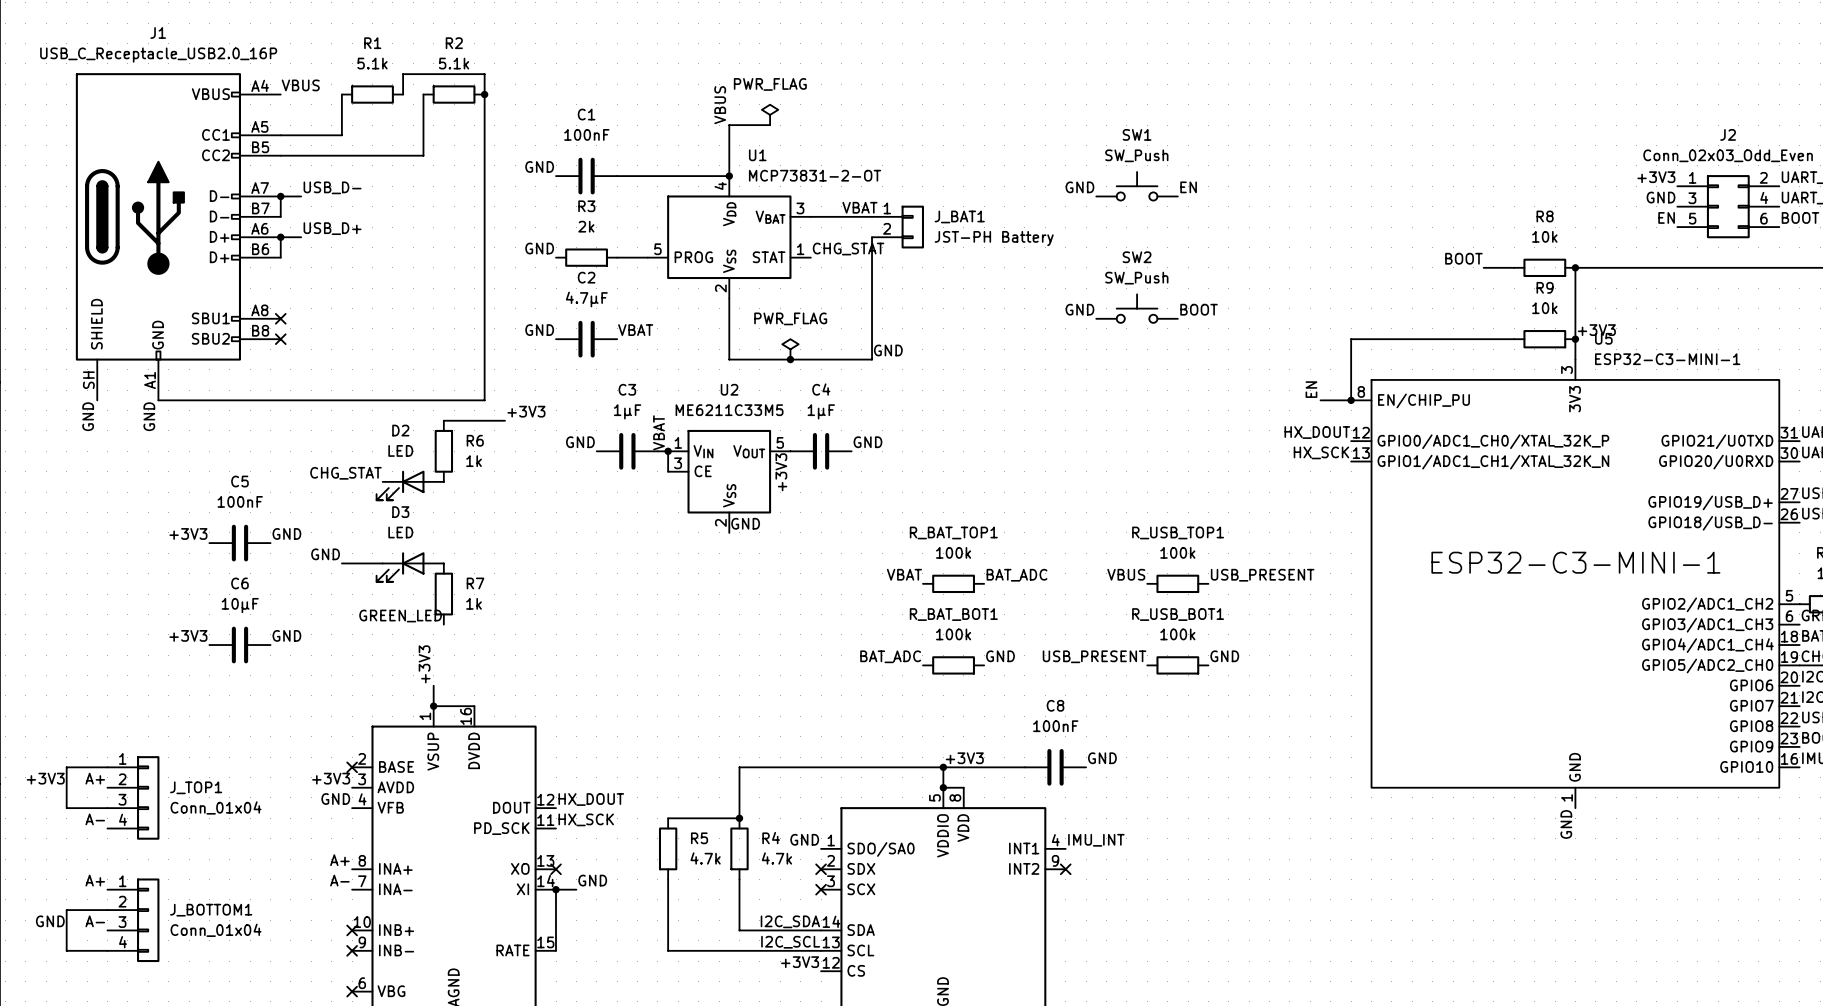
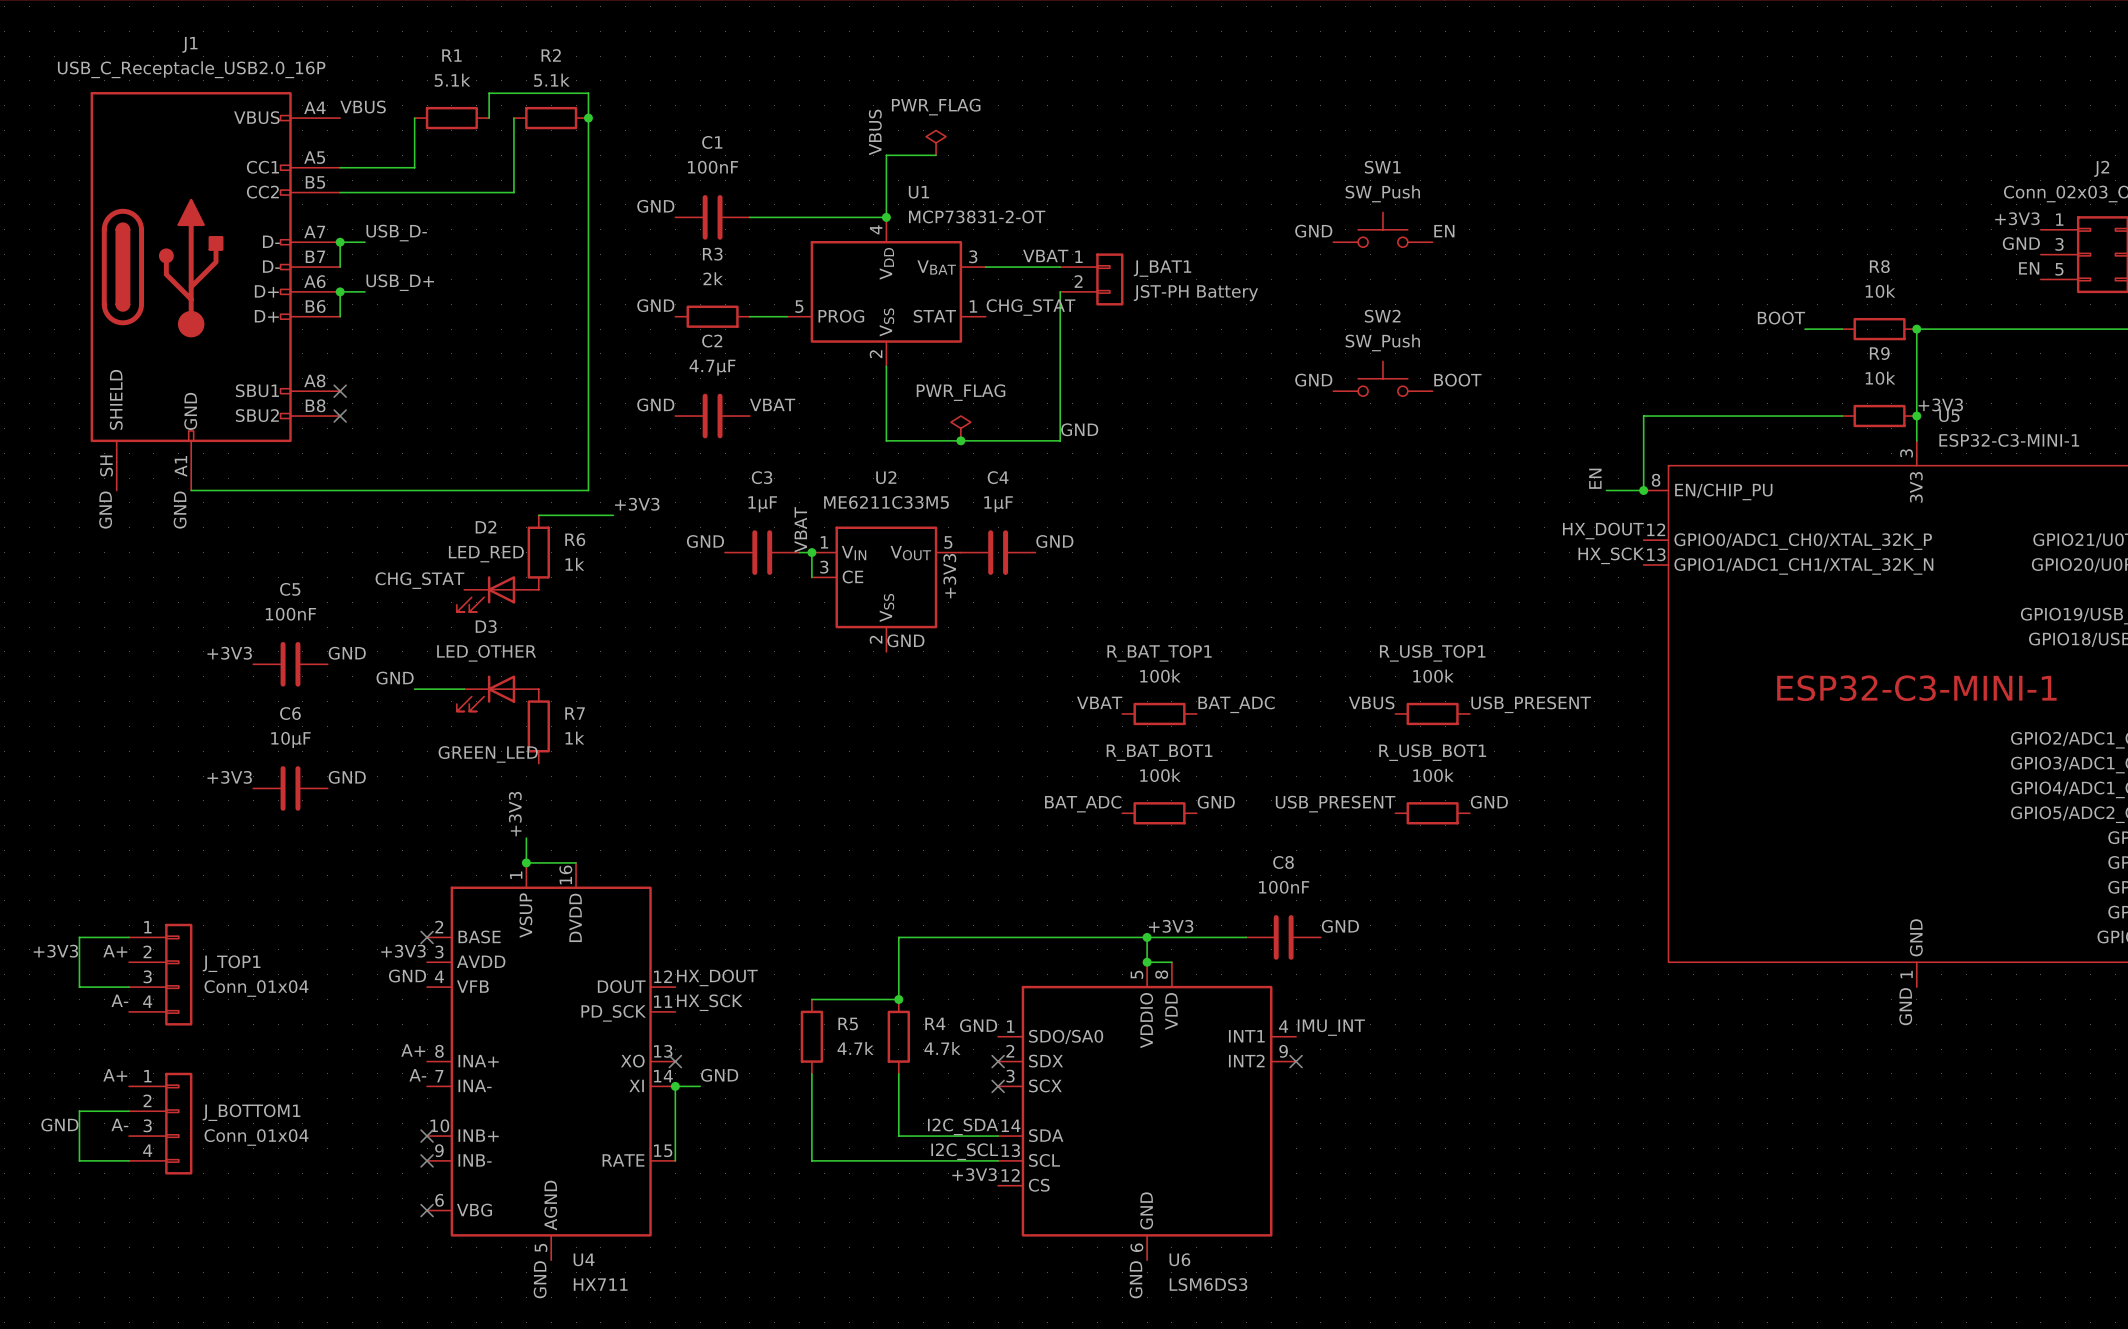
D2 value: LED (400, 450) -> LED_RED (486, 554)
D3 value: LED (400, 532) -> LED_OTHER (486, 653)

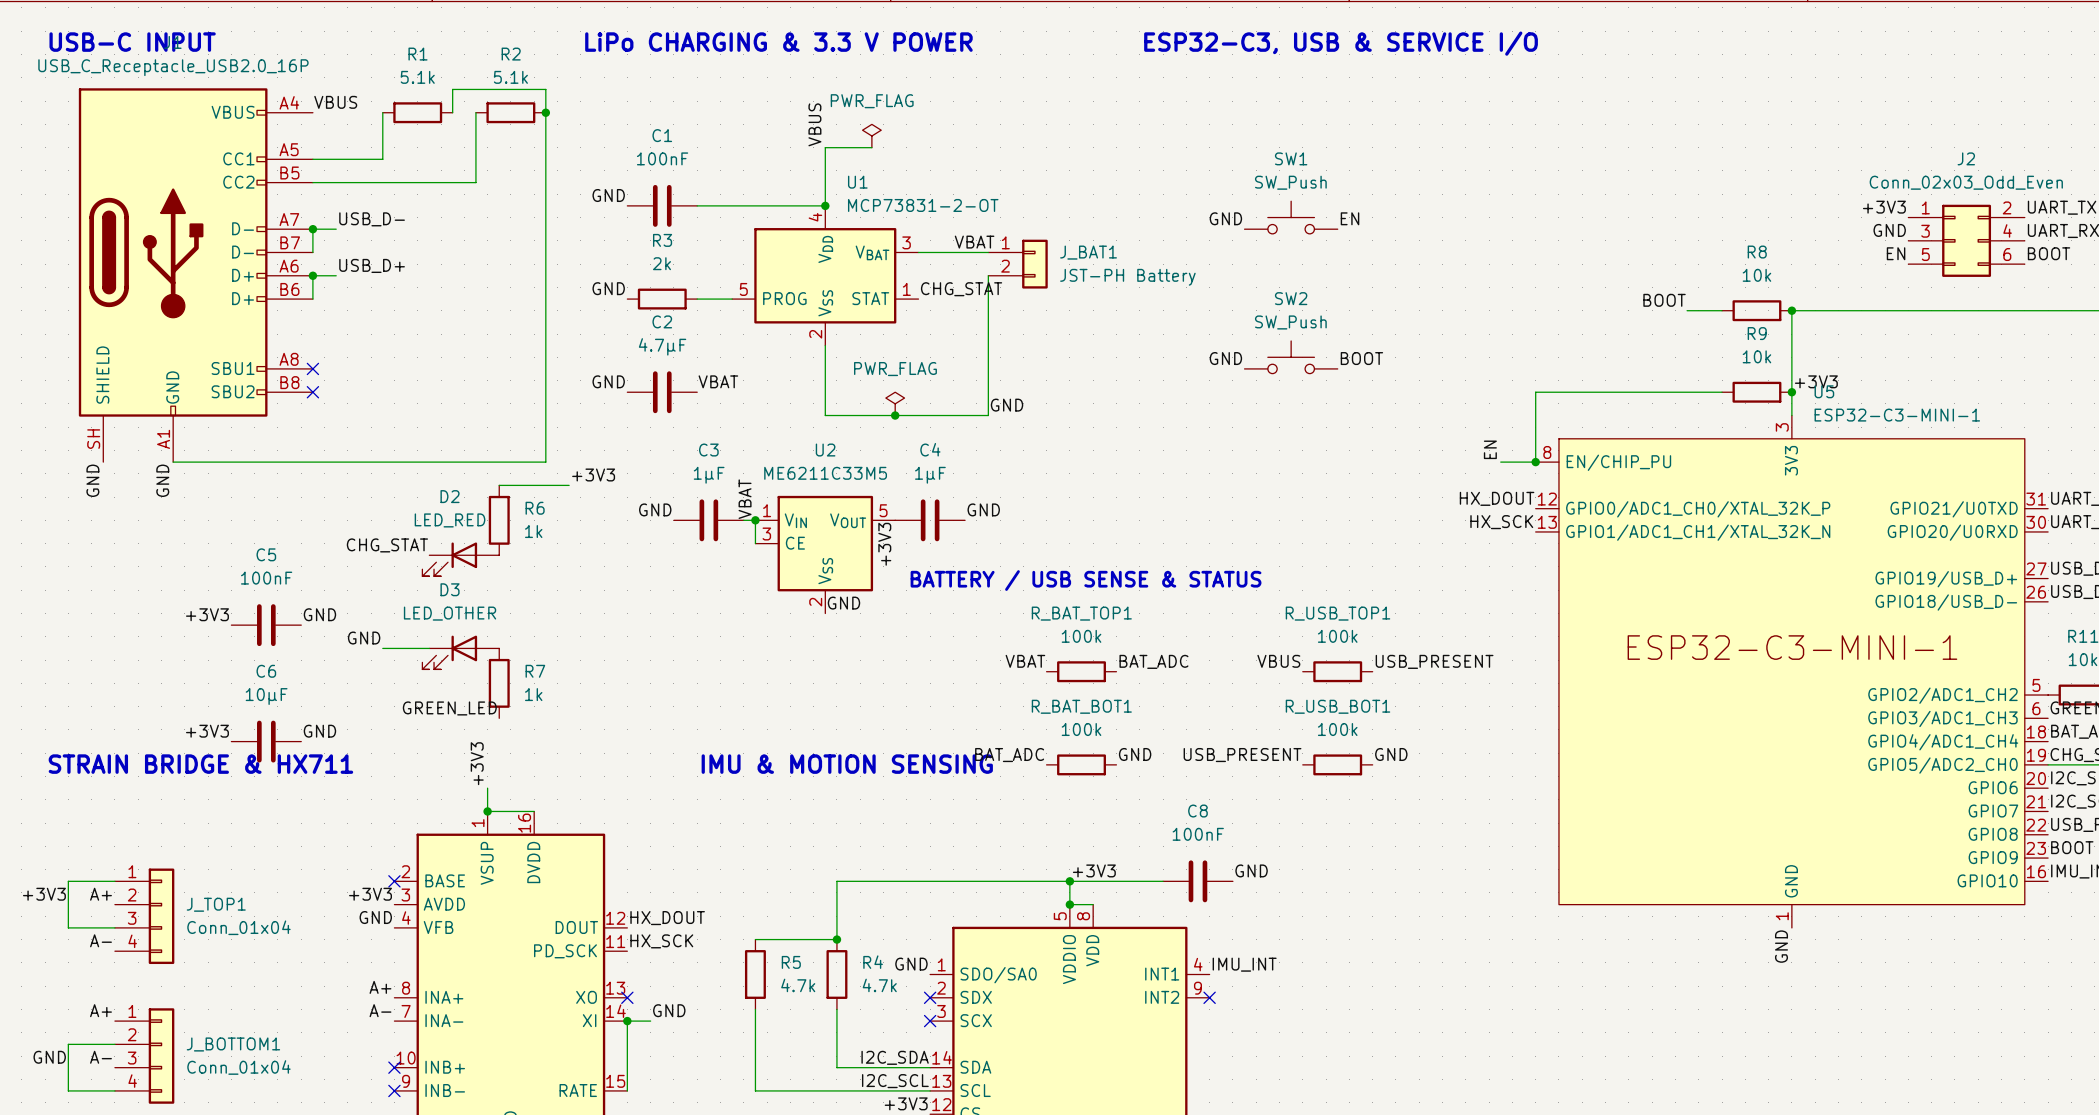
text: none -> USB-C INPUT (132, 42)
text: none -> LiPo CHARGING & 3.3 V POWER (778, 42)
text: none -> ESP32-C3, USB & SERVICE I/O (1341, 43)
text: none -> BATTERY / USB SENSE & STATUS (1086, 580)
text: none -> STRAIN BRIDGE & HX711 (200, 764)
text: none -> IMU & MOTION SENSING (847, 764)

